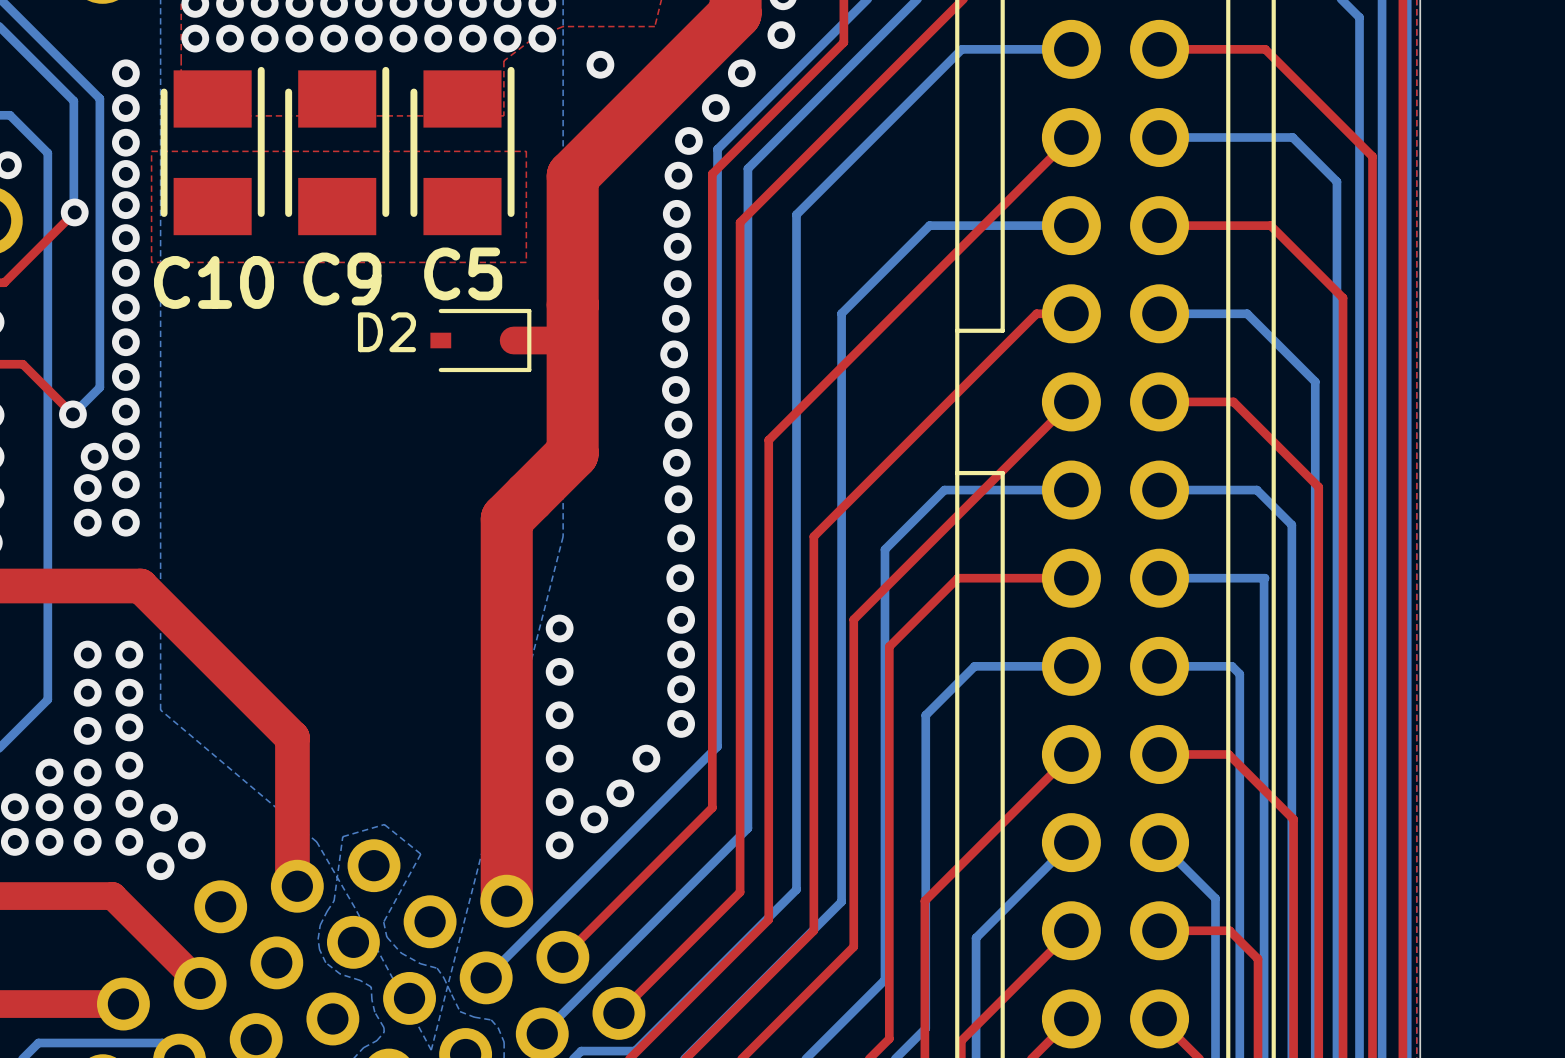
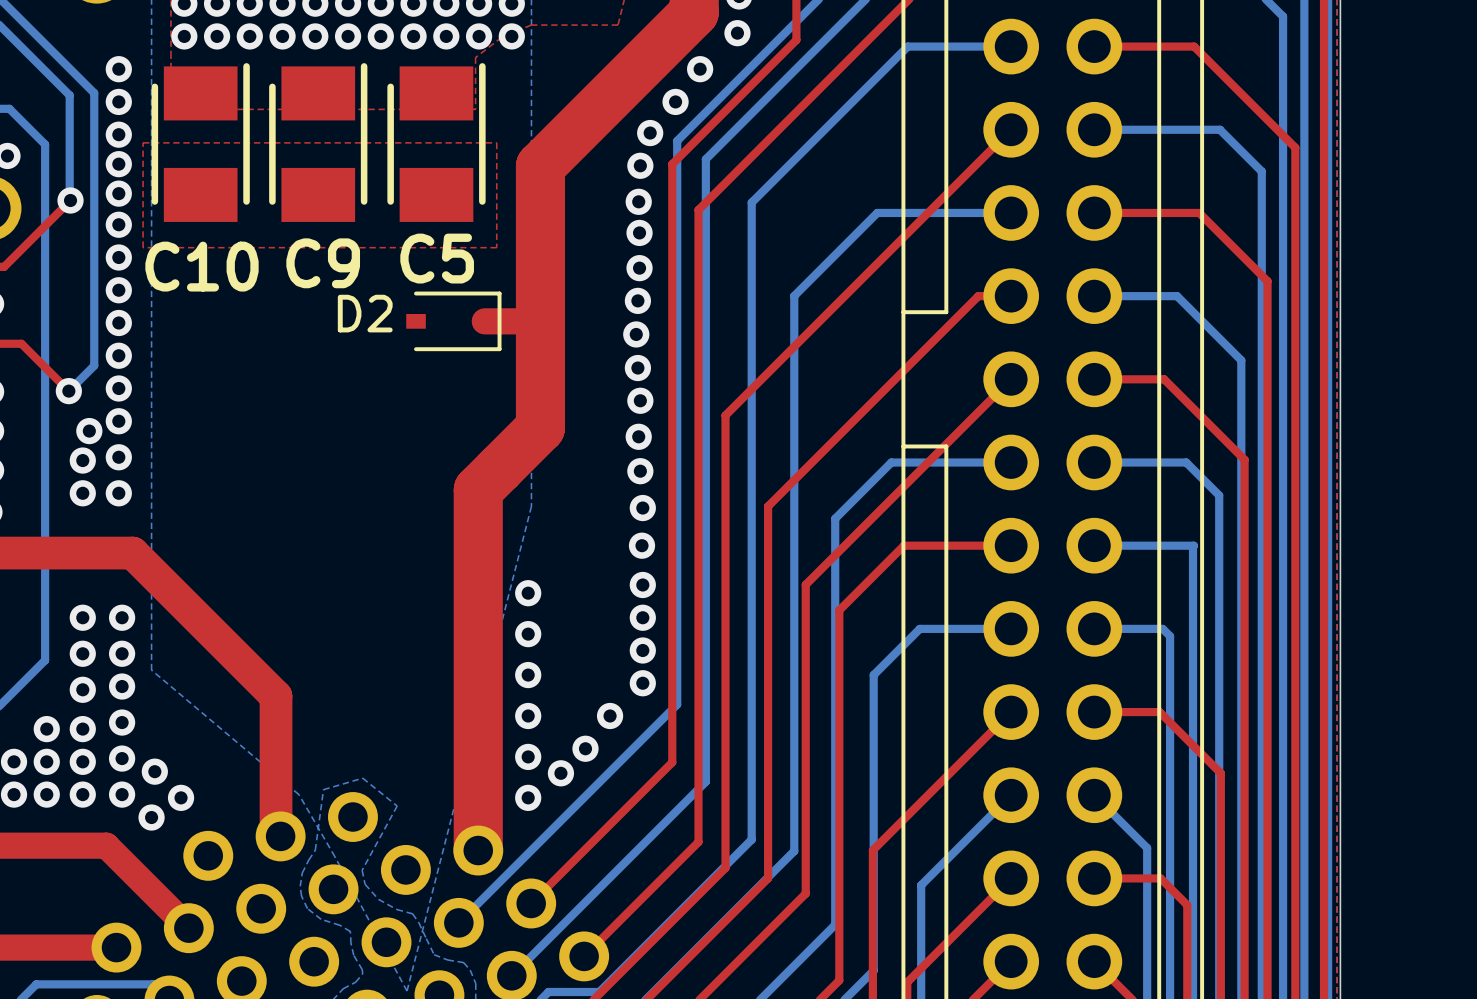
via: (600, 64) -> none

